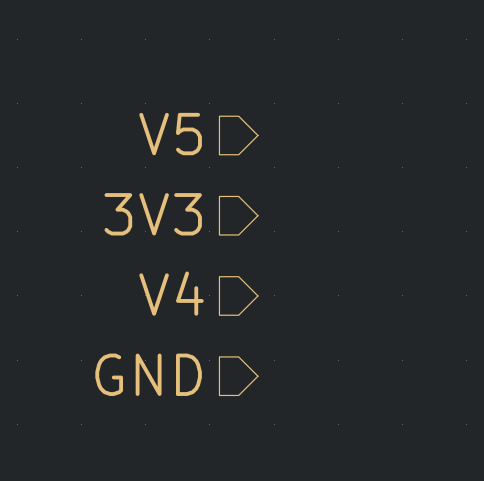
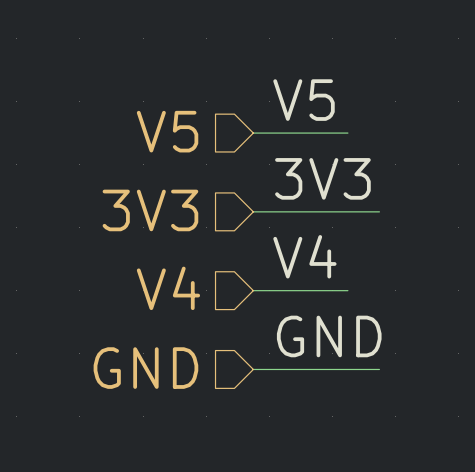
label: none -> V5 (304, 100)
wire: none -> (253, 133) (347, 133)
label: none -> 3V3 (322, 178)
wire: none -> (253, 211) (379, 211)
label: none -> V4 (304, 256)
wire: none -> (253, 290) (347, 290)
label: none -> GND (329, 336)
wire: none -> (253, 369) (379, 369)

